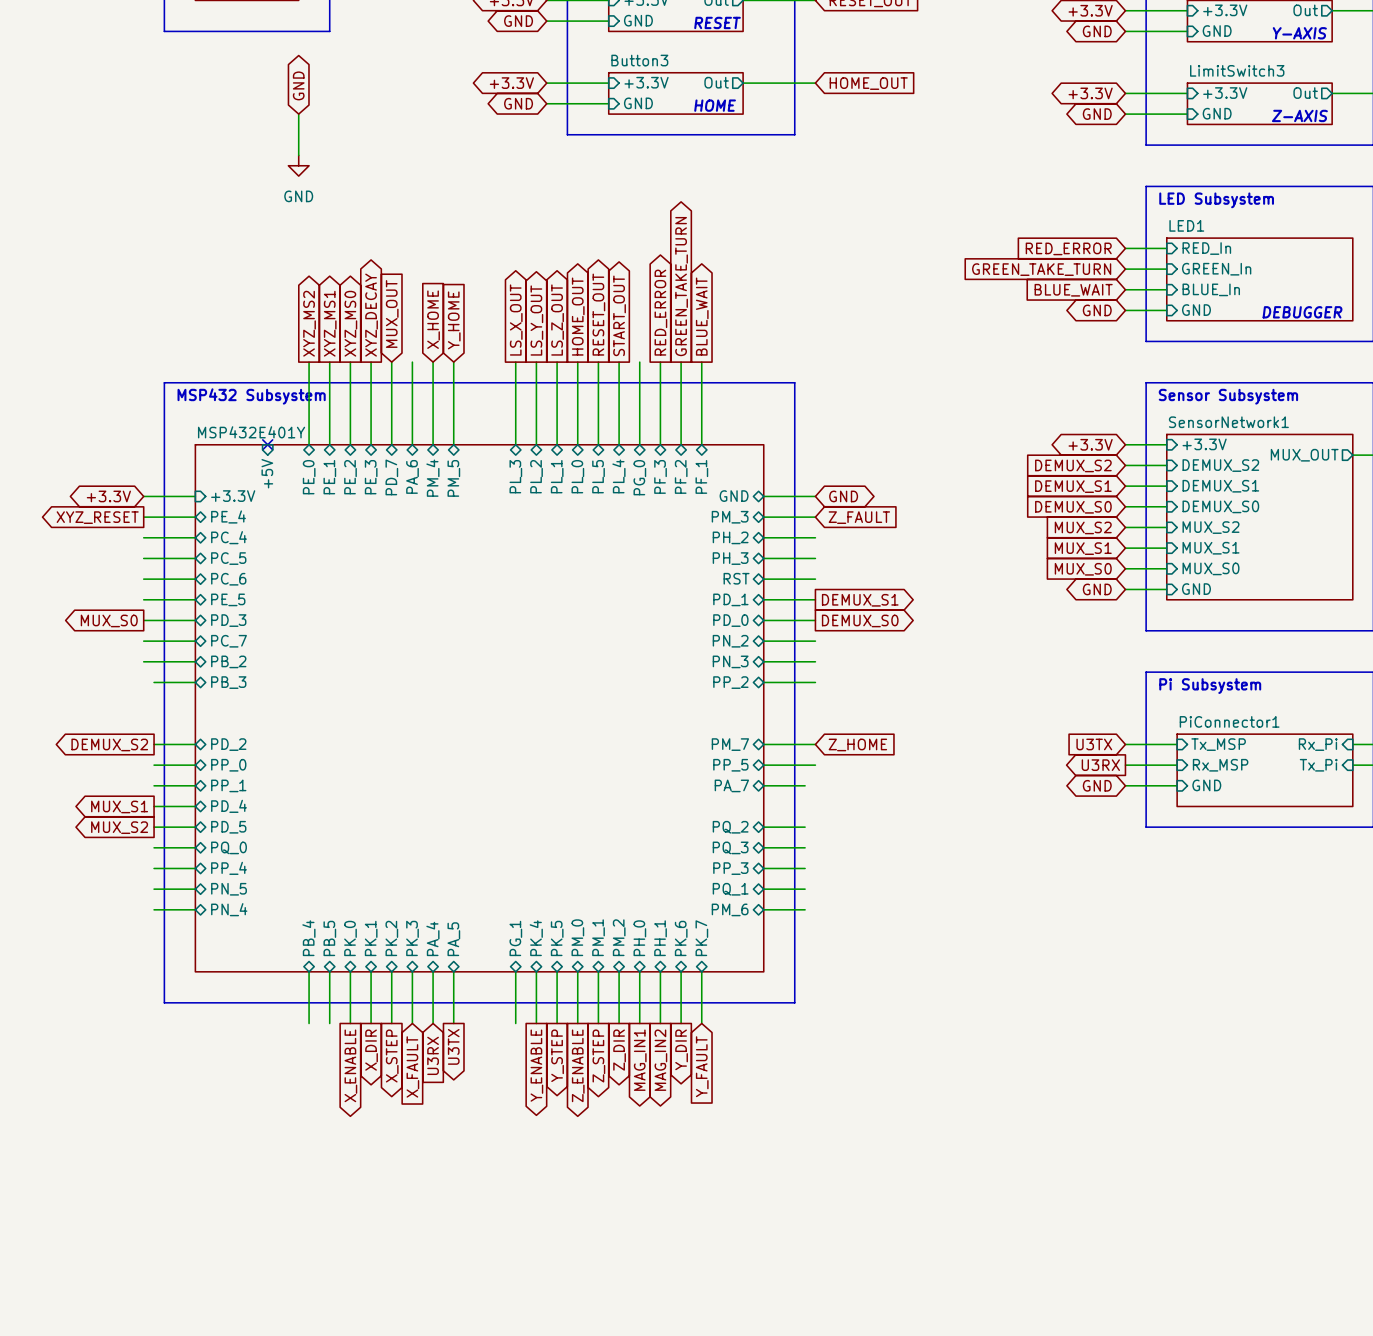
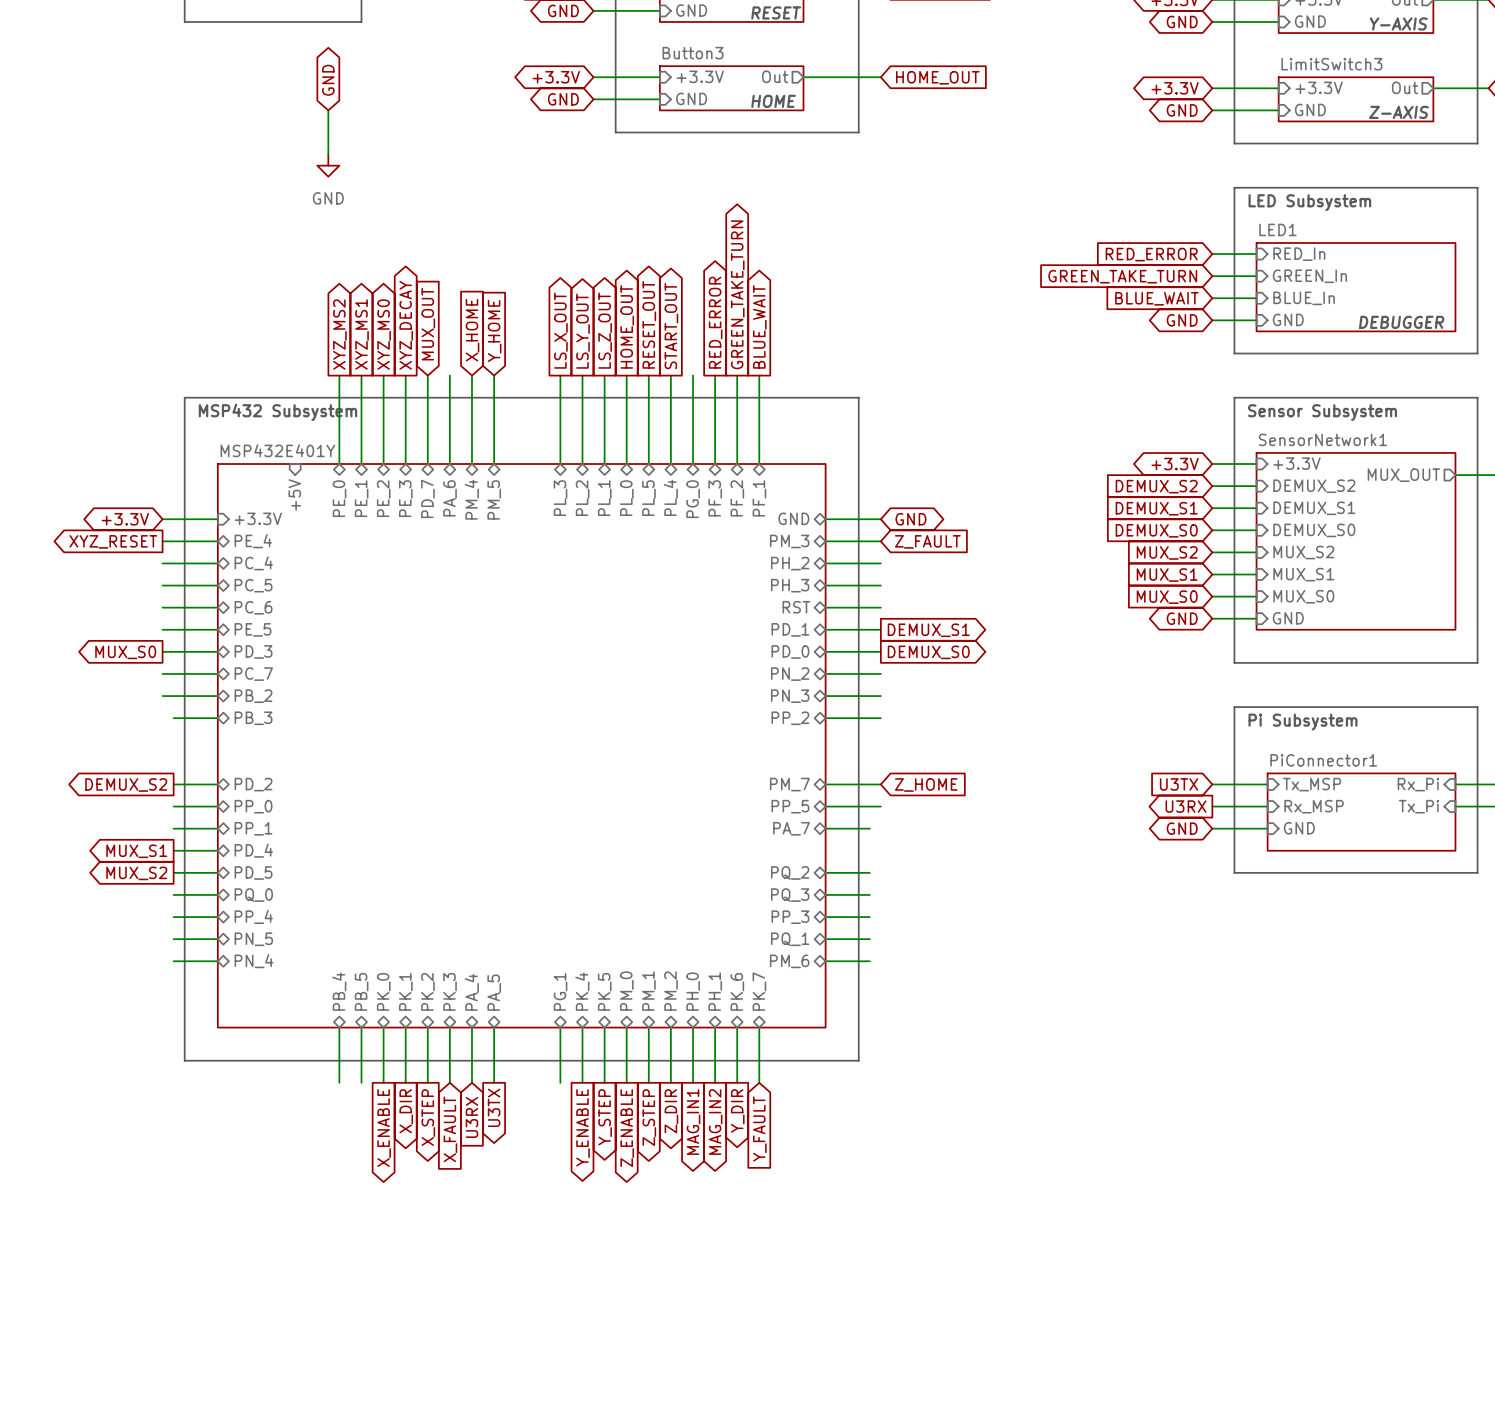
no-connect mark: (267, 444) -> none

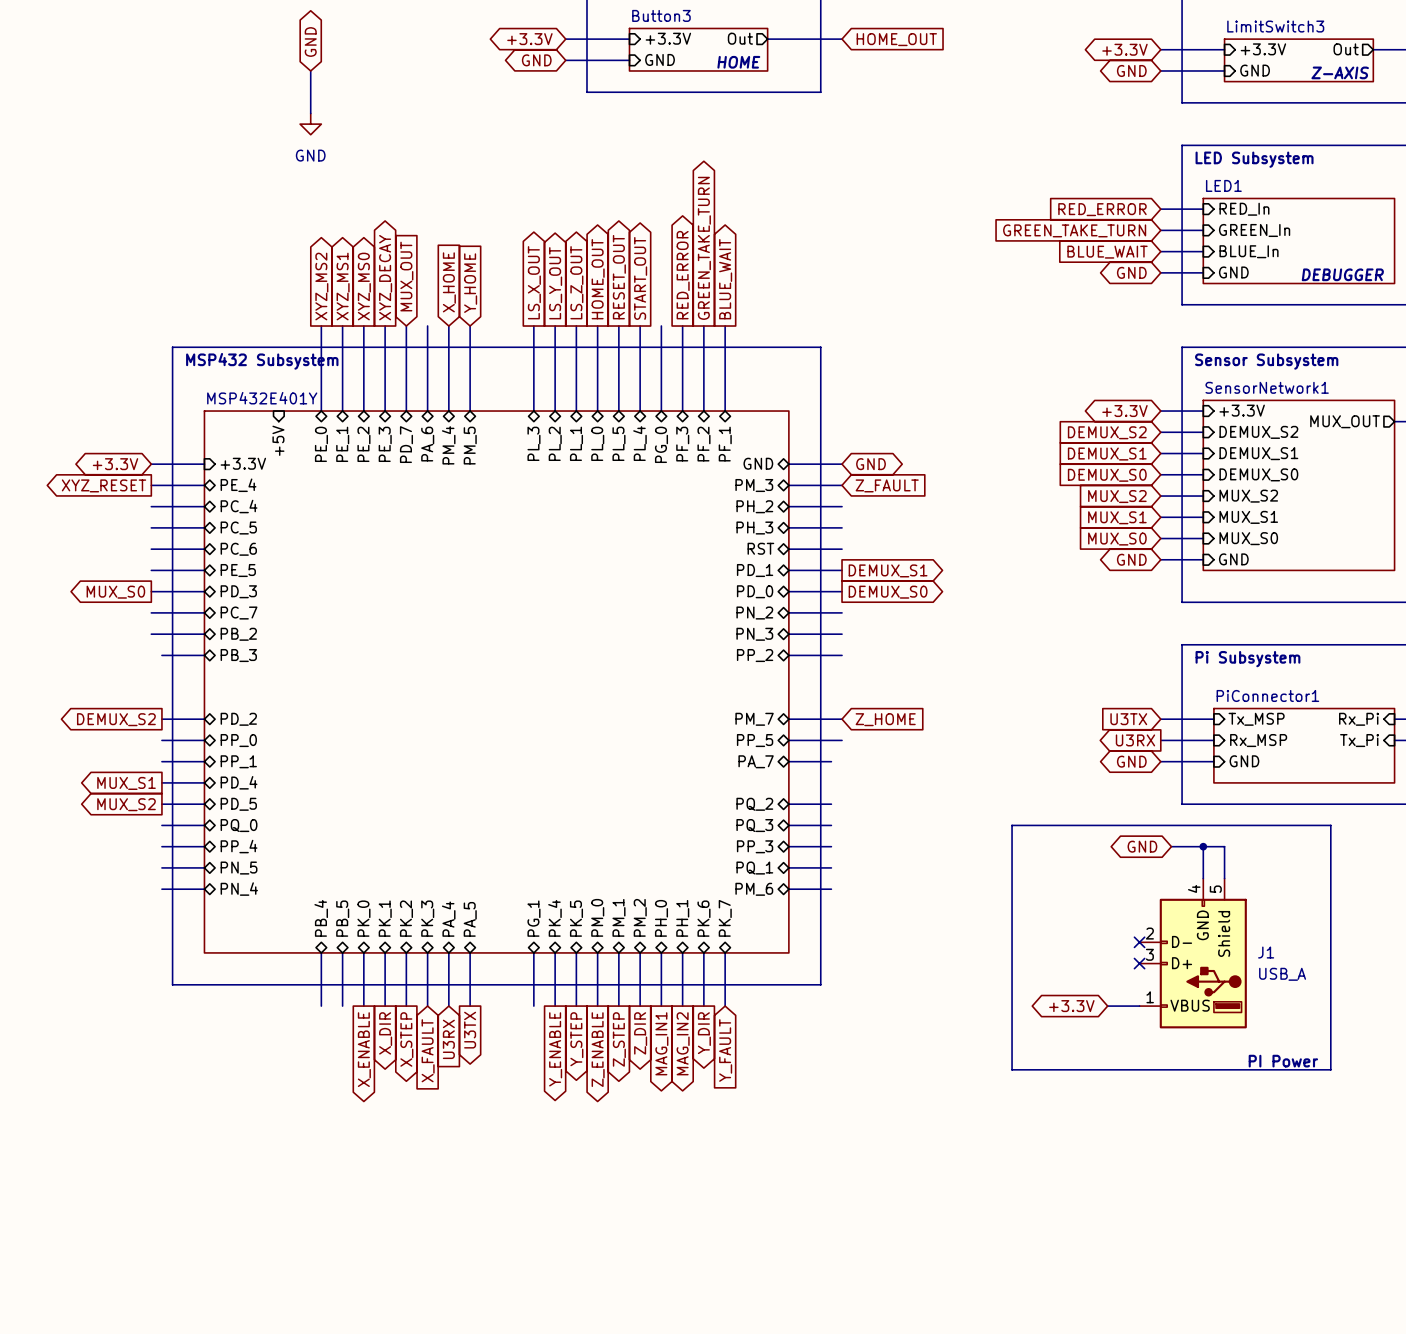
line: none -> (1012, 825) (1012, 1069) (1330, 1069) (1330, 825) (1012, 825)
global label: none -> GND (1142, 846)
wire: none -> (1171, 846) (1224, 846) (1224, 878)
wire: none -> (1203, 846) (1203, 878)
junction: none -> (1203, 846)
no-connect mark: none -> (1139, 942)
J1: none -> USB_A (1193, 953)
no-connect mark: none -> (1139, 963)
global label: none -> +3.3V (1071, 1006)
wire: none -> (1107, 1006) (1139, 1006)
text: none -> PI Power (1283, 1061)

